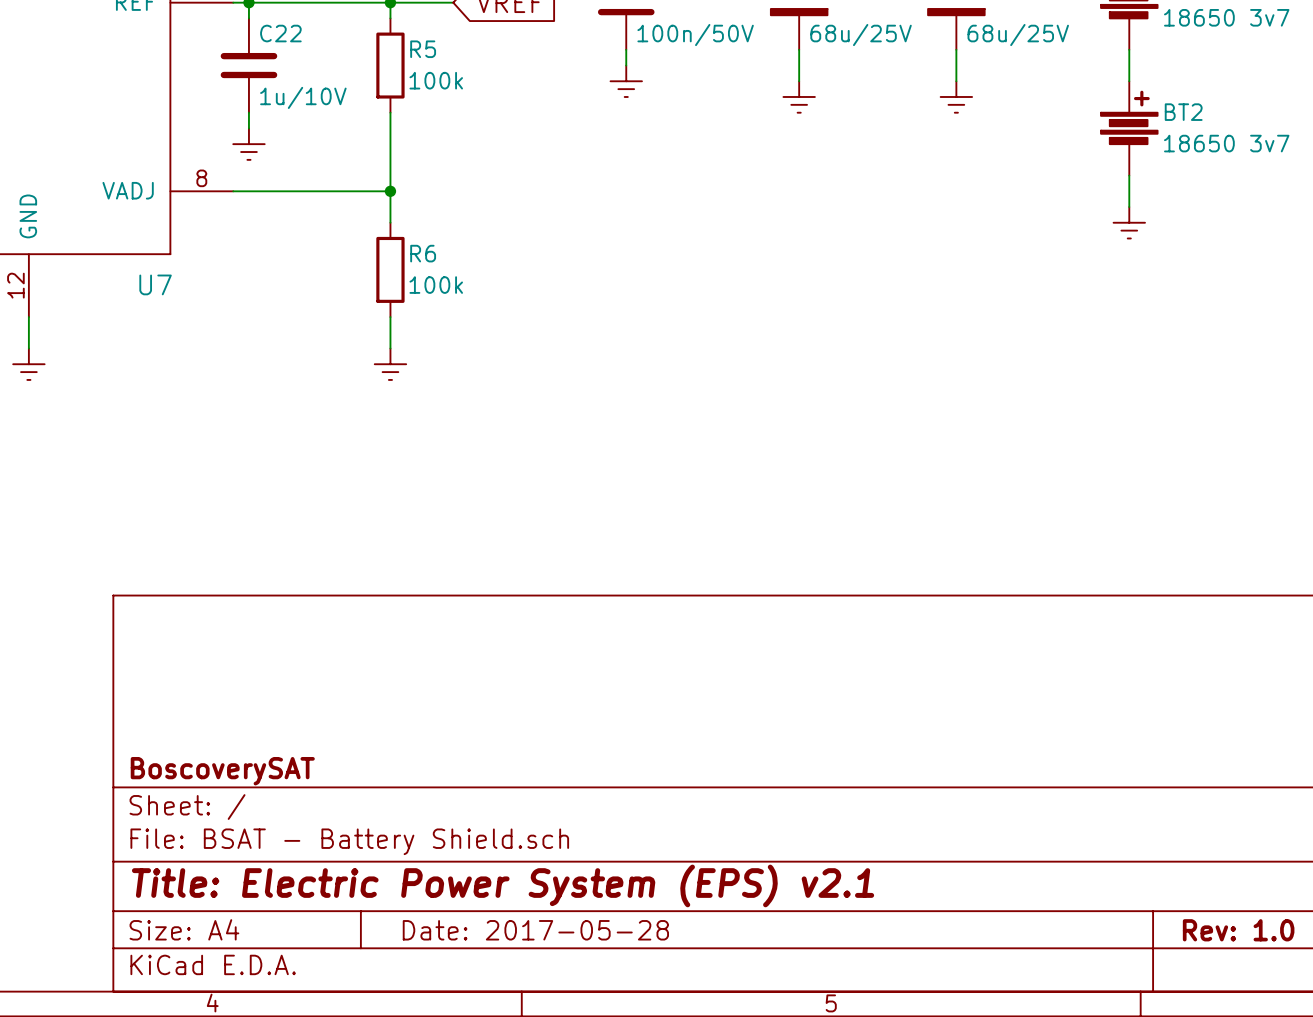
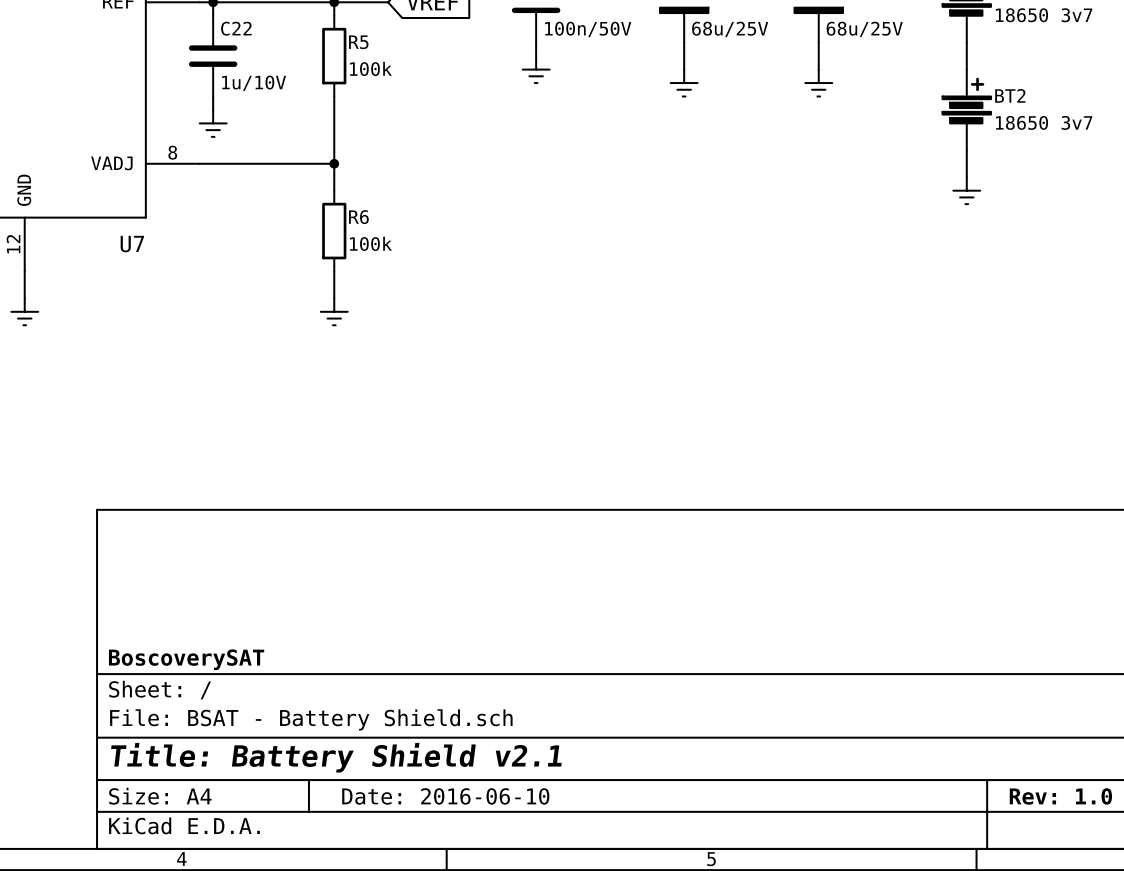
title block: Title: Electric Power System (EPS) v2.1 (503, 885) -> Title: Battery Shield v2.1 (336, 757)
title block: Date: 2017-05-28 (535, 930) -> Date: 2016-06-10 (445, 796)

